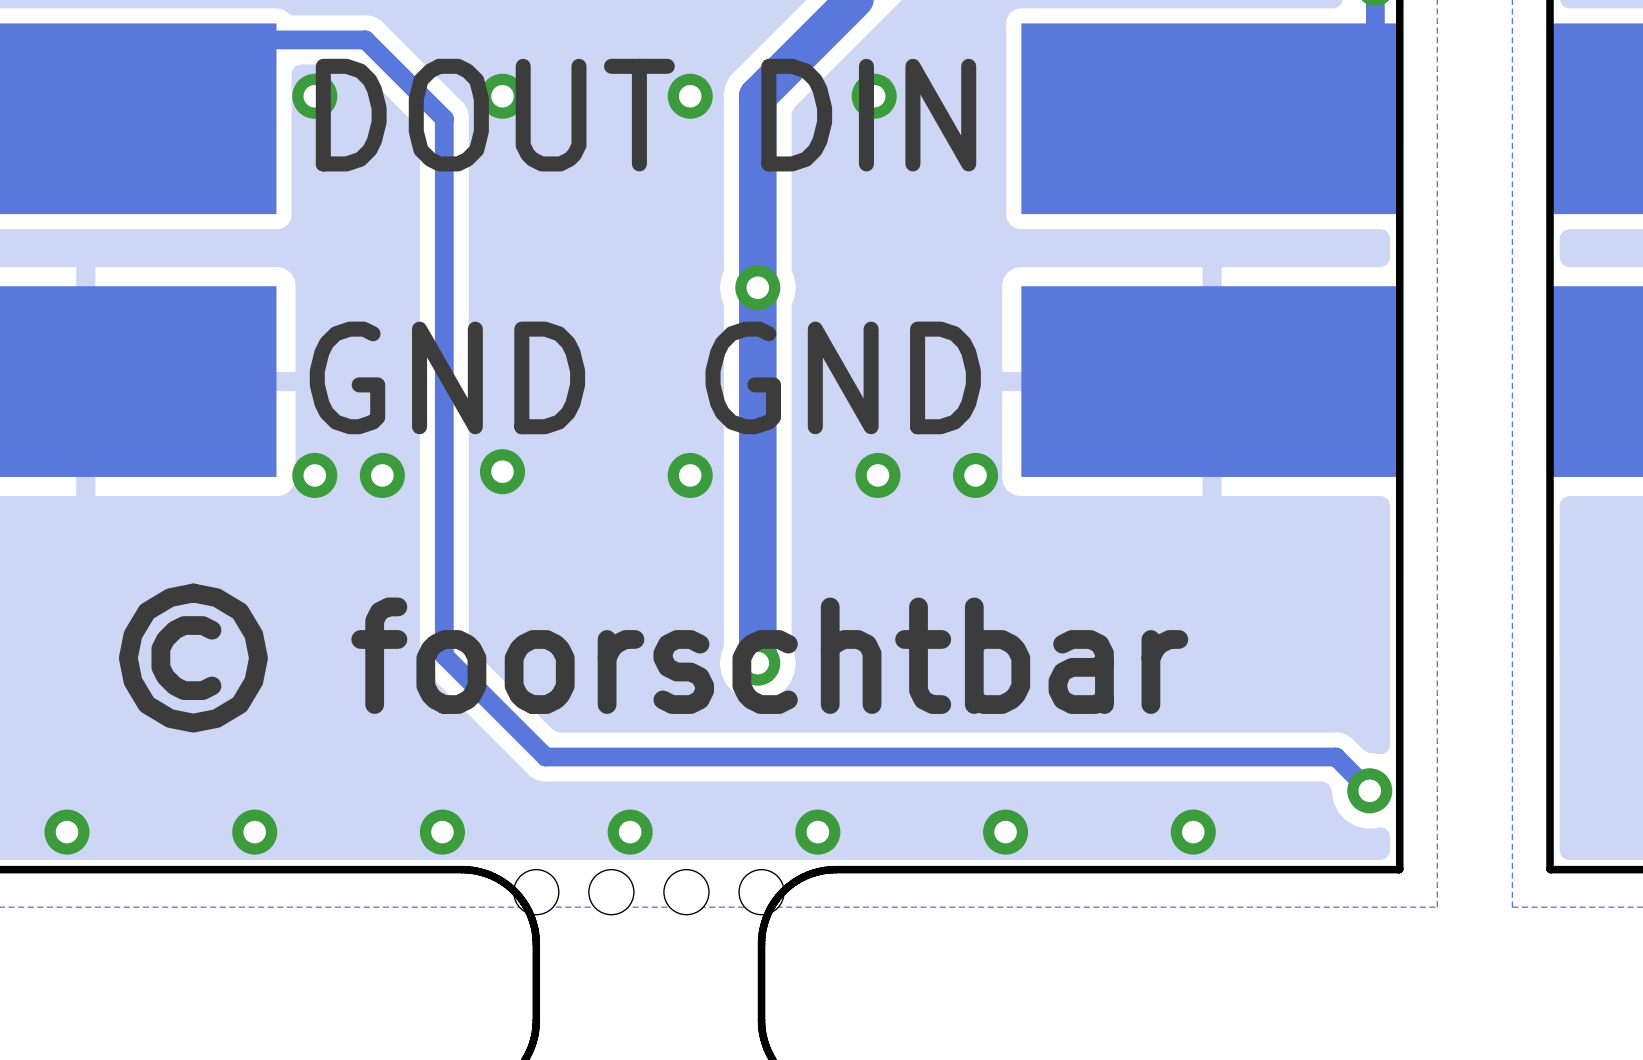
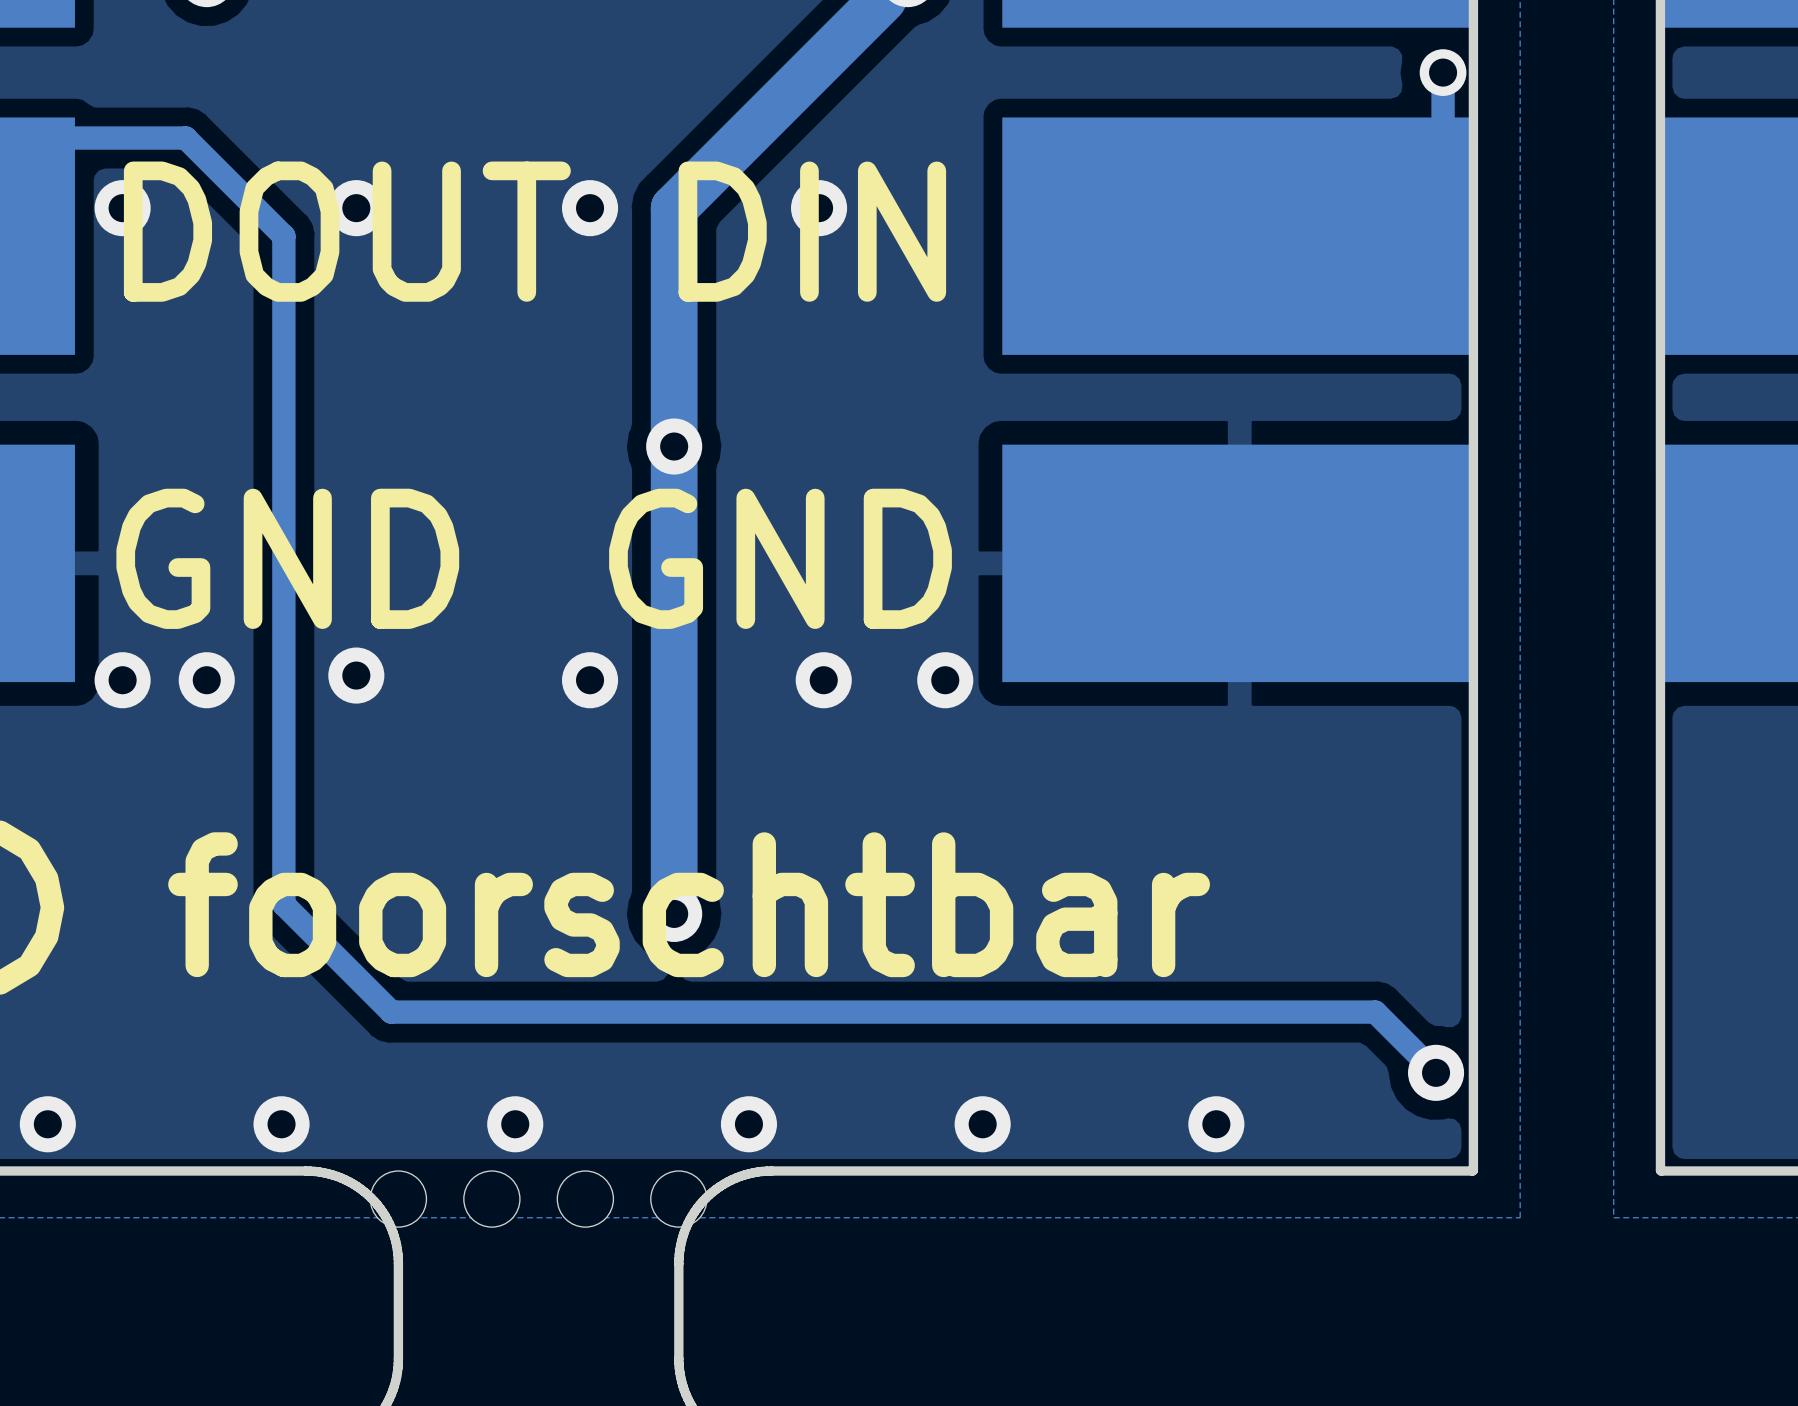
track: (530, 741) (545, 757) (1335, 757) -> (391, 1012) (1375, 1012) (1393, 1030)

